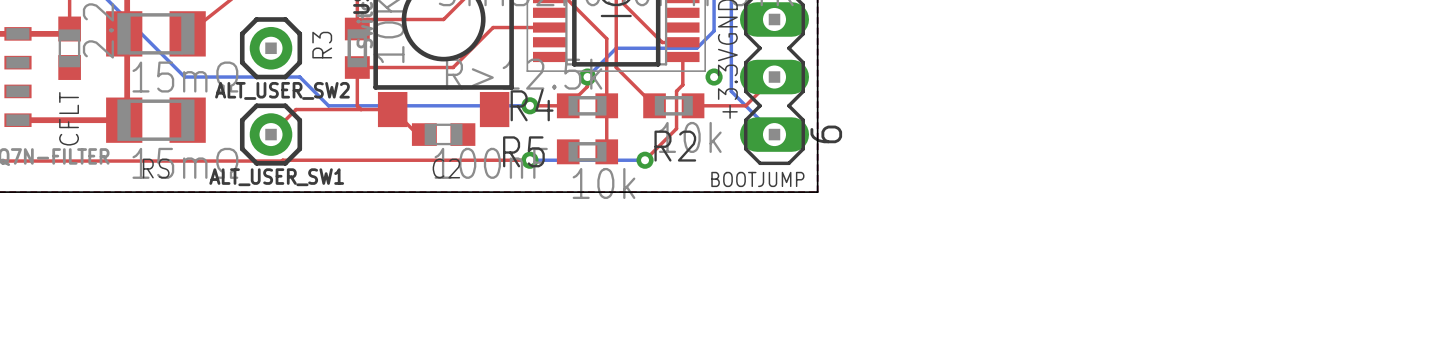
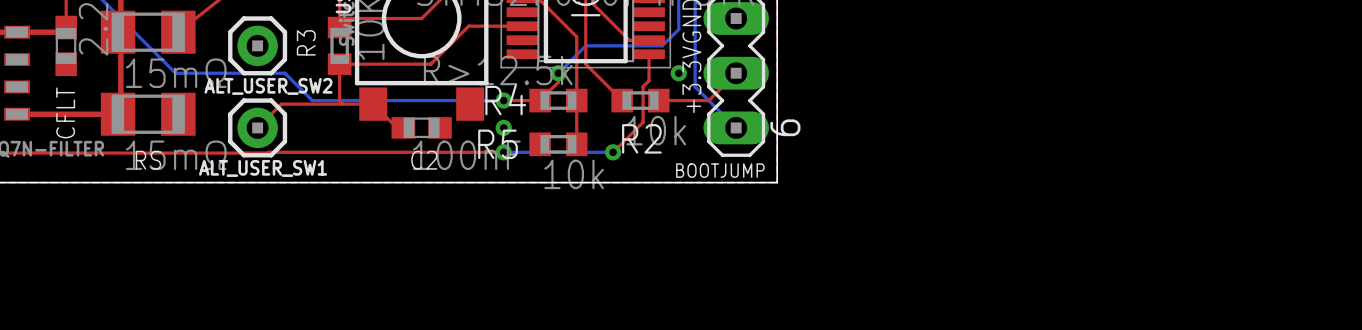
via: none -> (503, 127)

